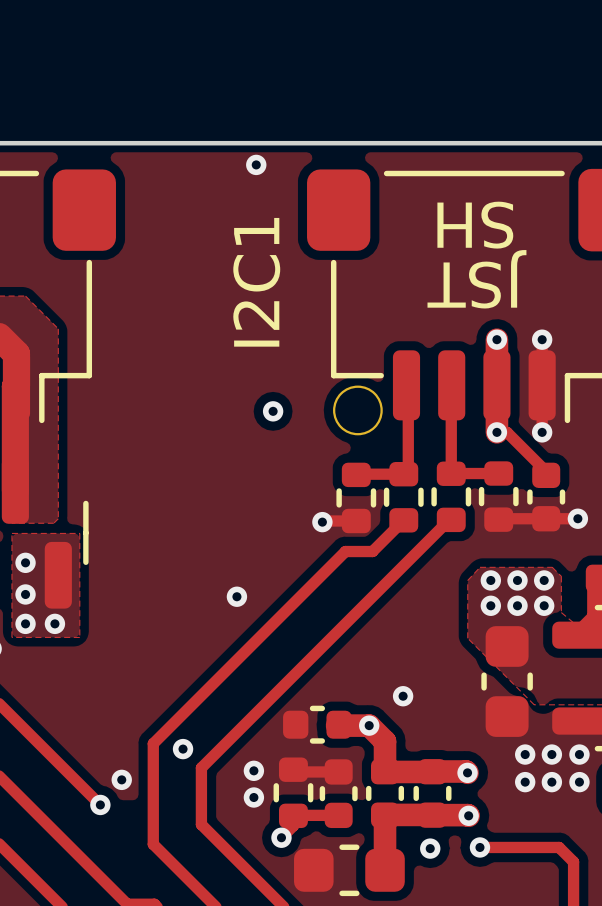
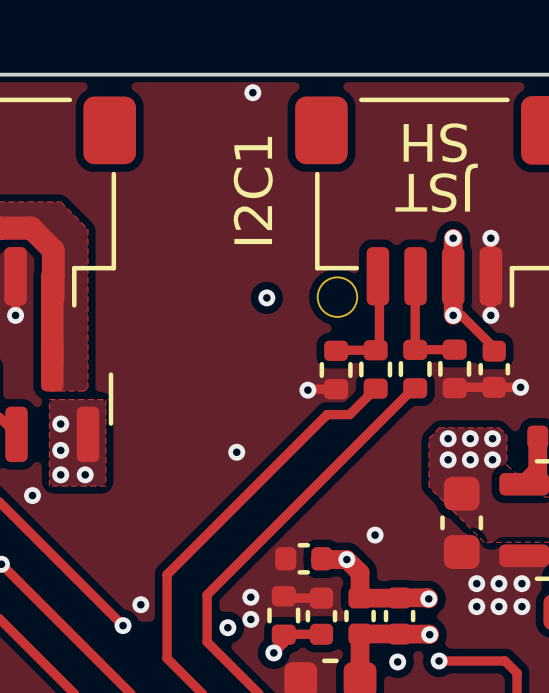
via position: (183, 749) -> (227, 627)

